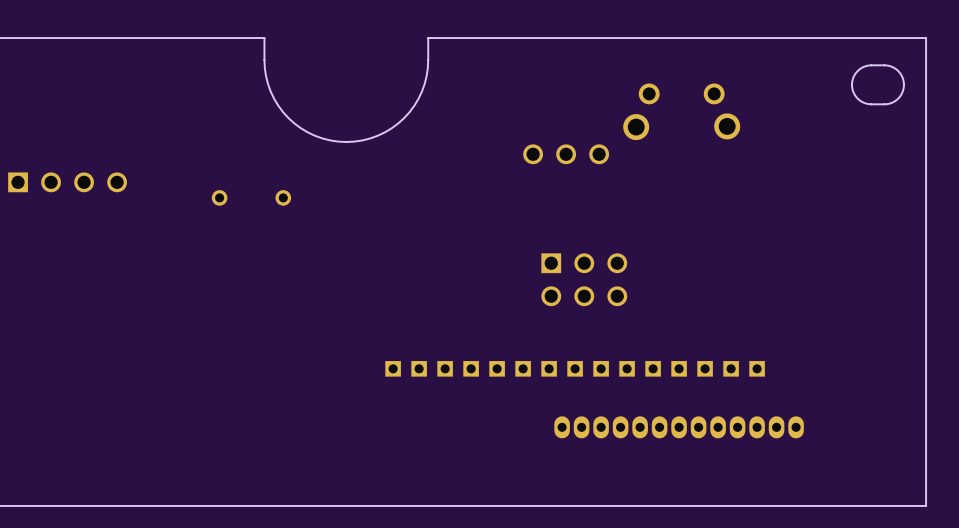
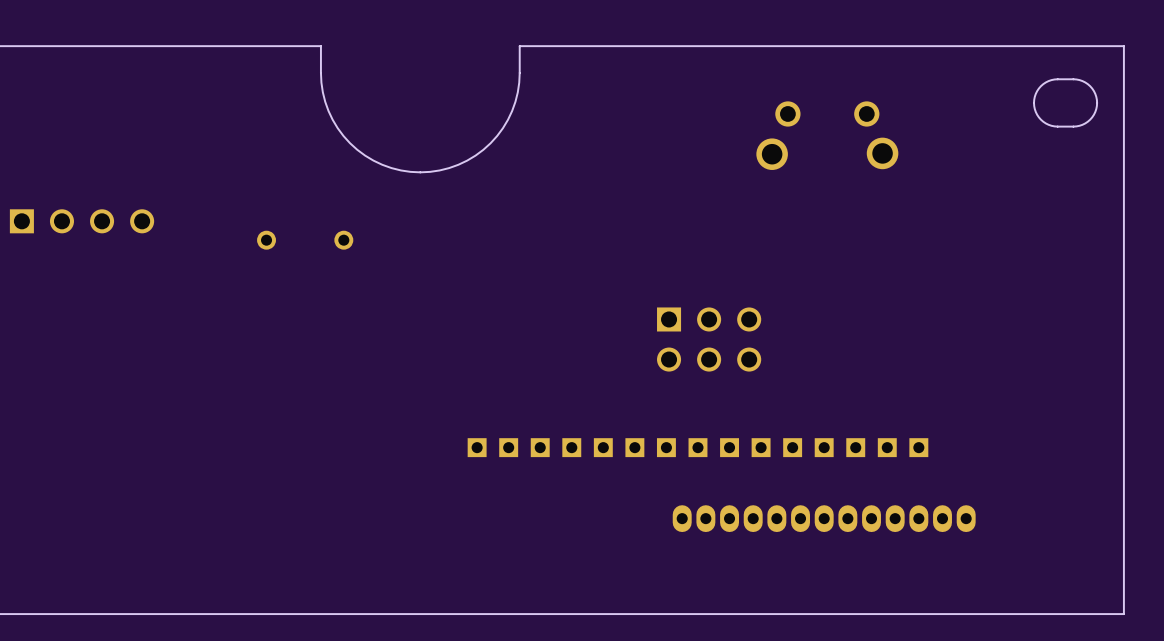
part: (533, 154) -> none
part: (566, 154) -> none
part: (599, 154) -> none

